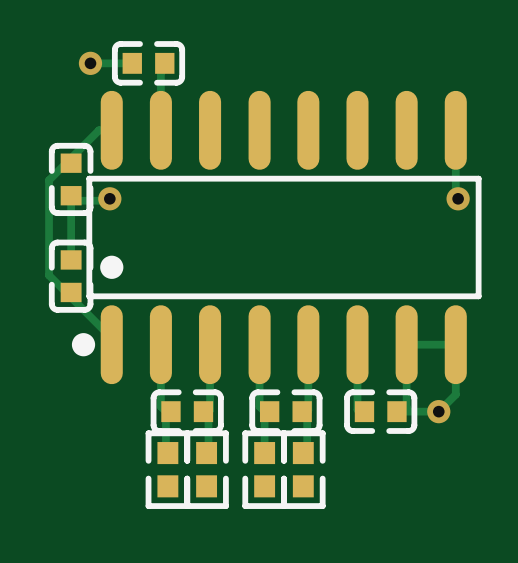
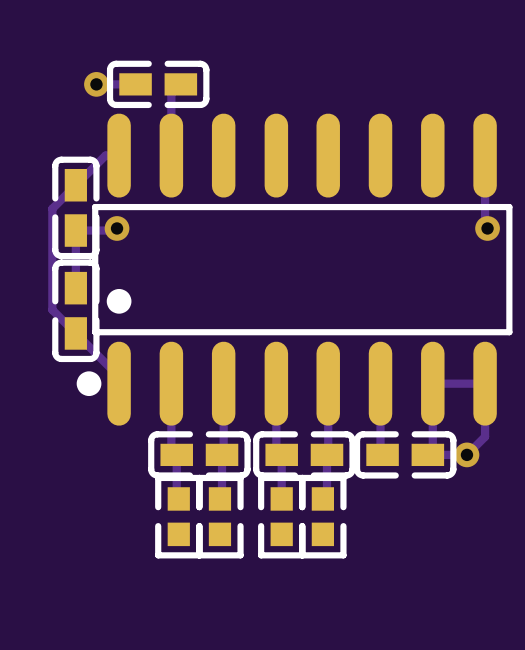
part footprint: [111, 41, 186, 86] -> [106, 60, 210, 109]
part footprint: [48, 142, 94, 217] -> [52, 156, 100, 260]
part footprint: [48, 239, 94, 313] -> [52, 259, 100, 363]
part footprint: [150, 389, 224, 434] -> [148, 431, 251, 479]
part footprint: [249, 389, 323, 434] -> [253, 431, 356, 479]
part footprint: [344, 389, 418, 434] -> [353, 431, 457, 479]

